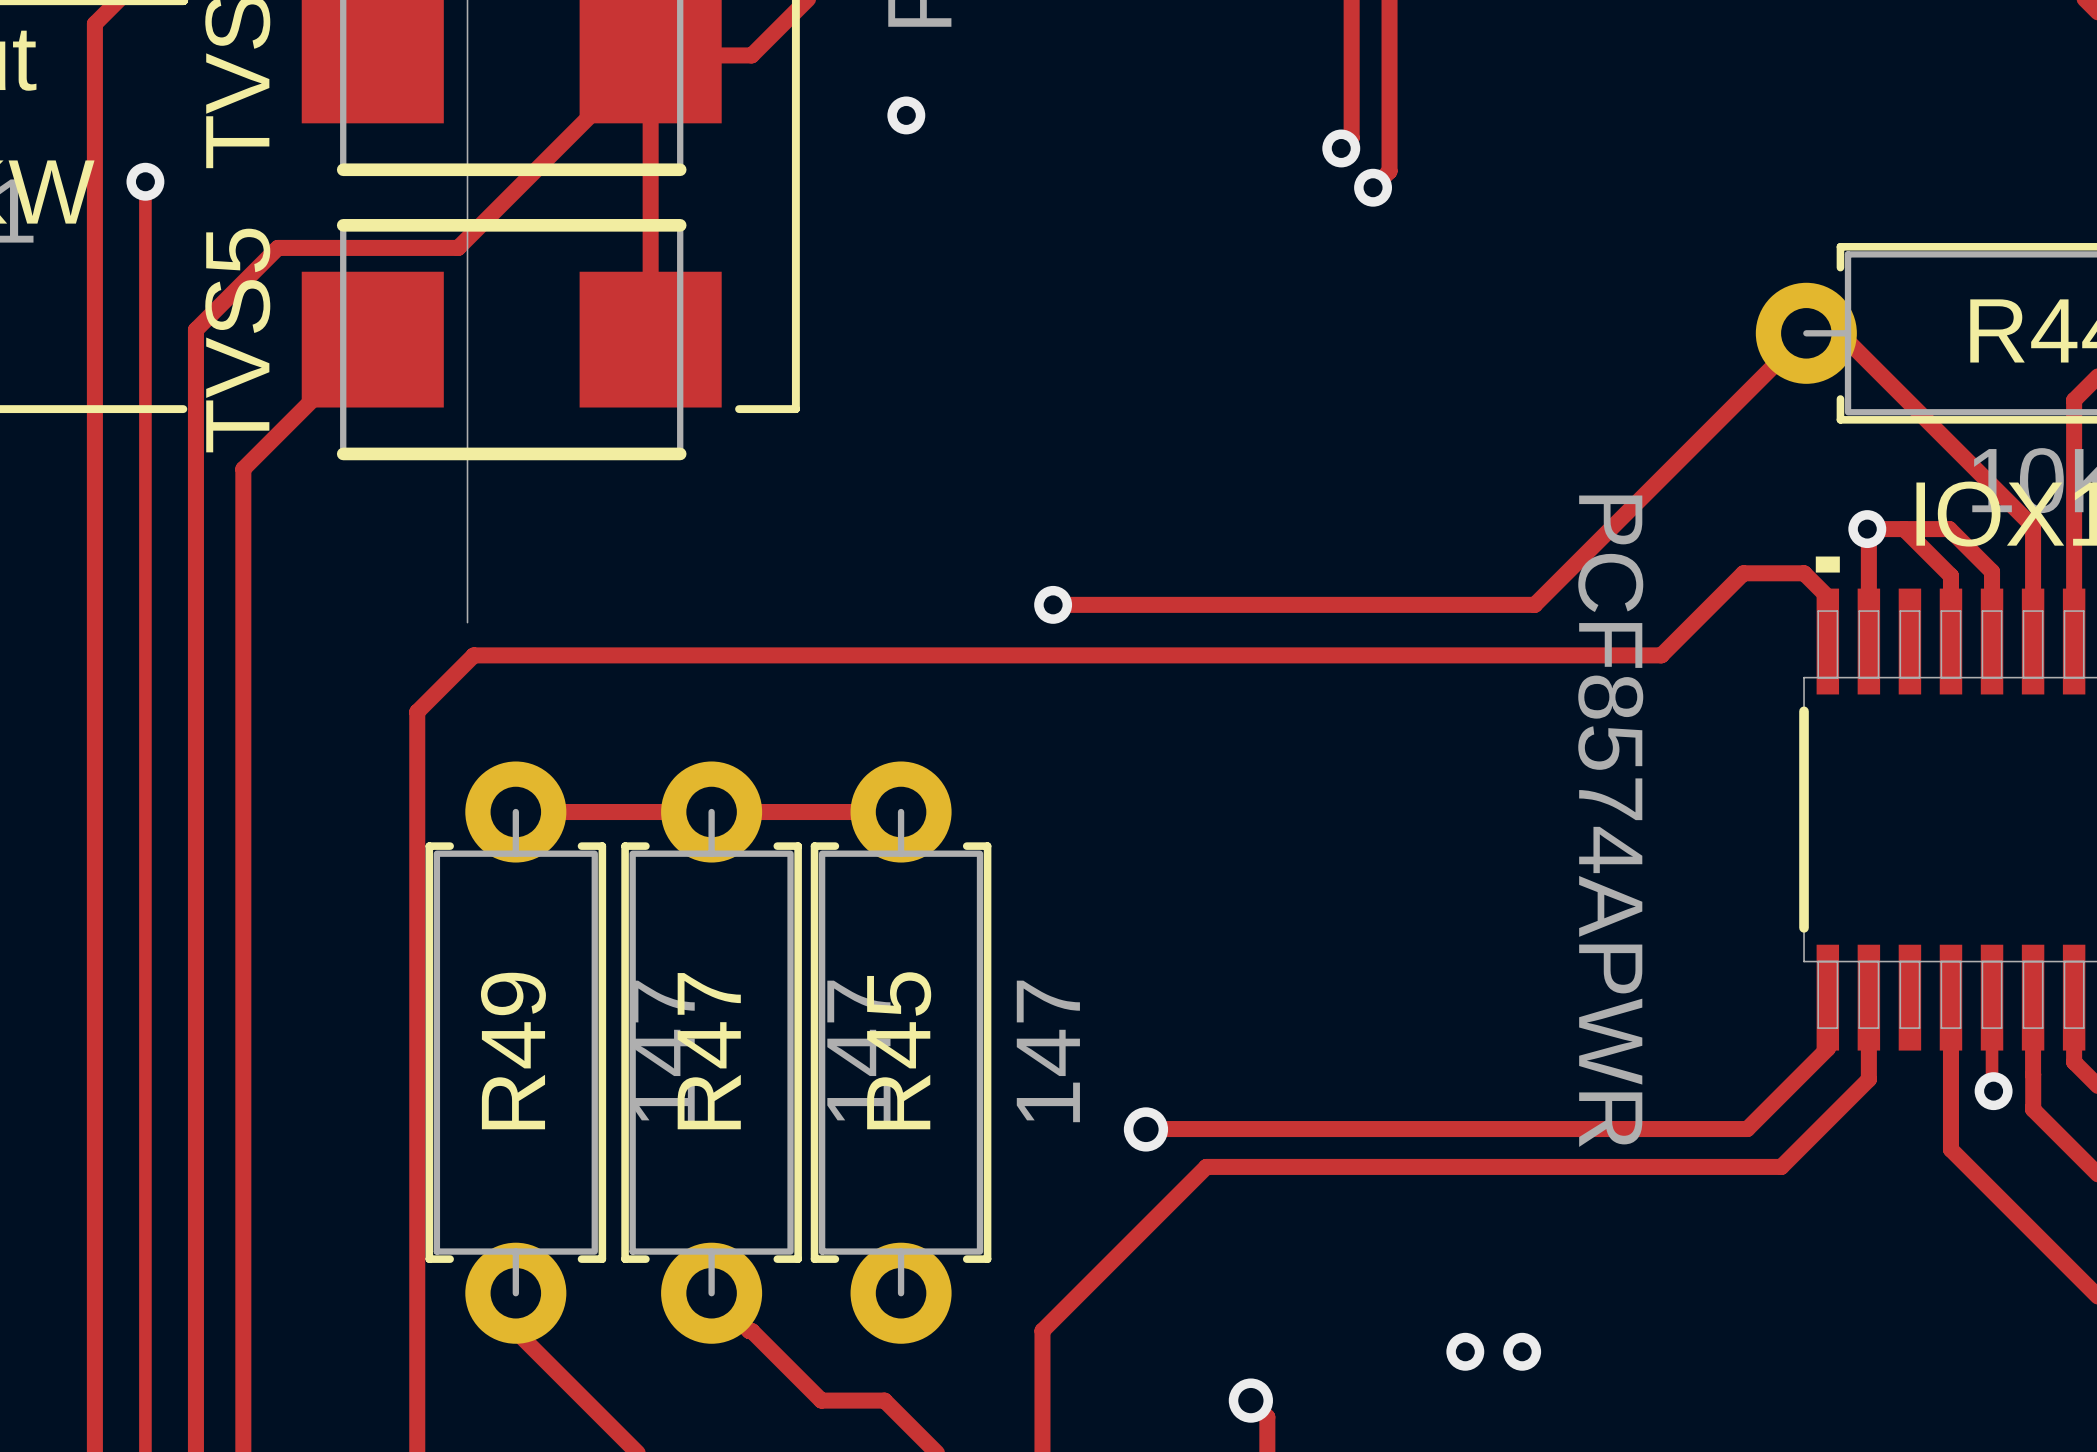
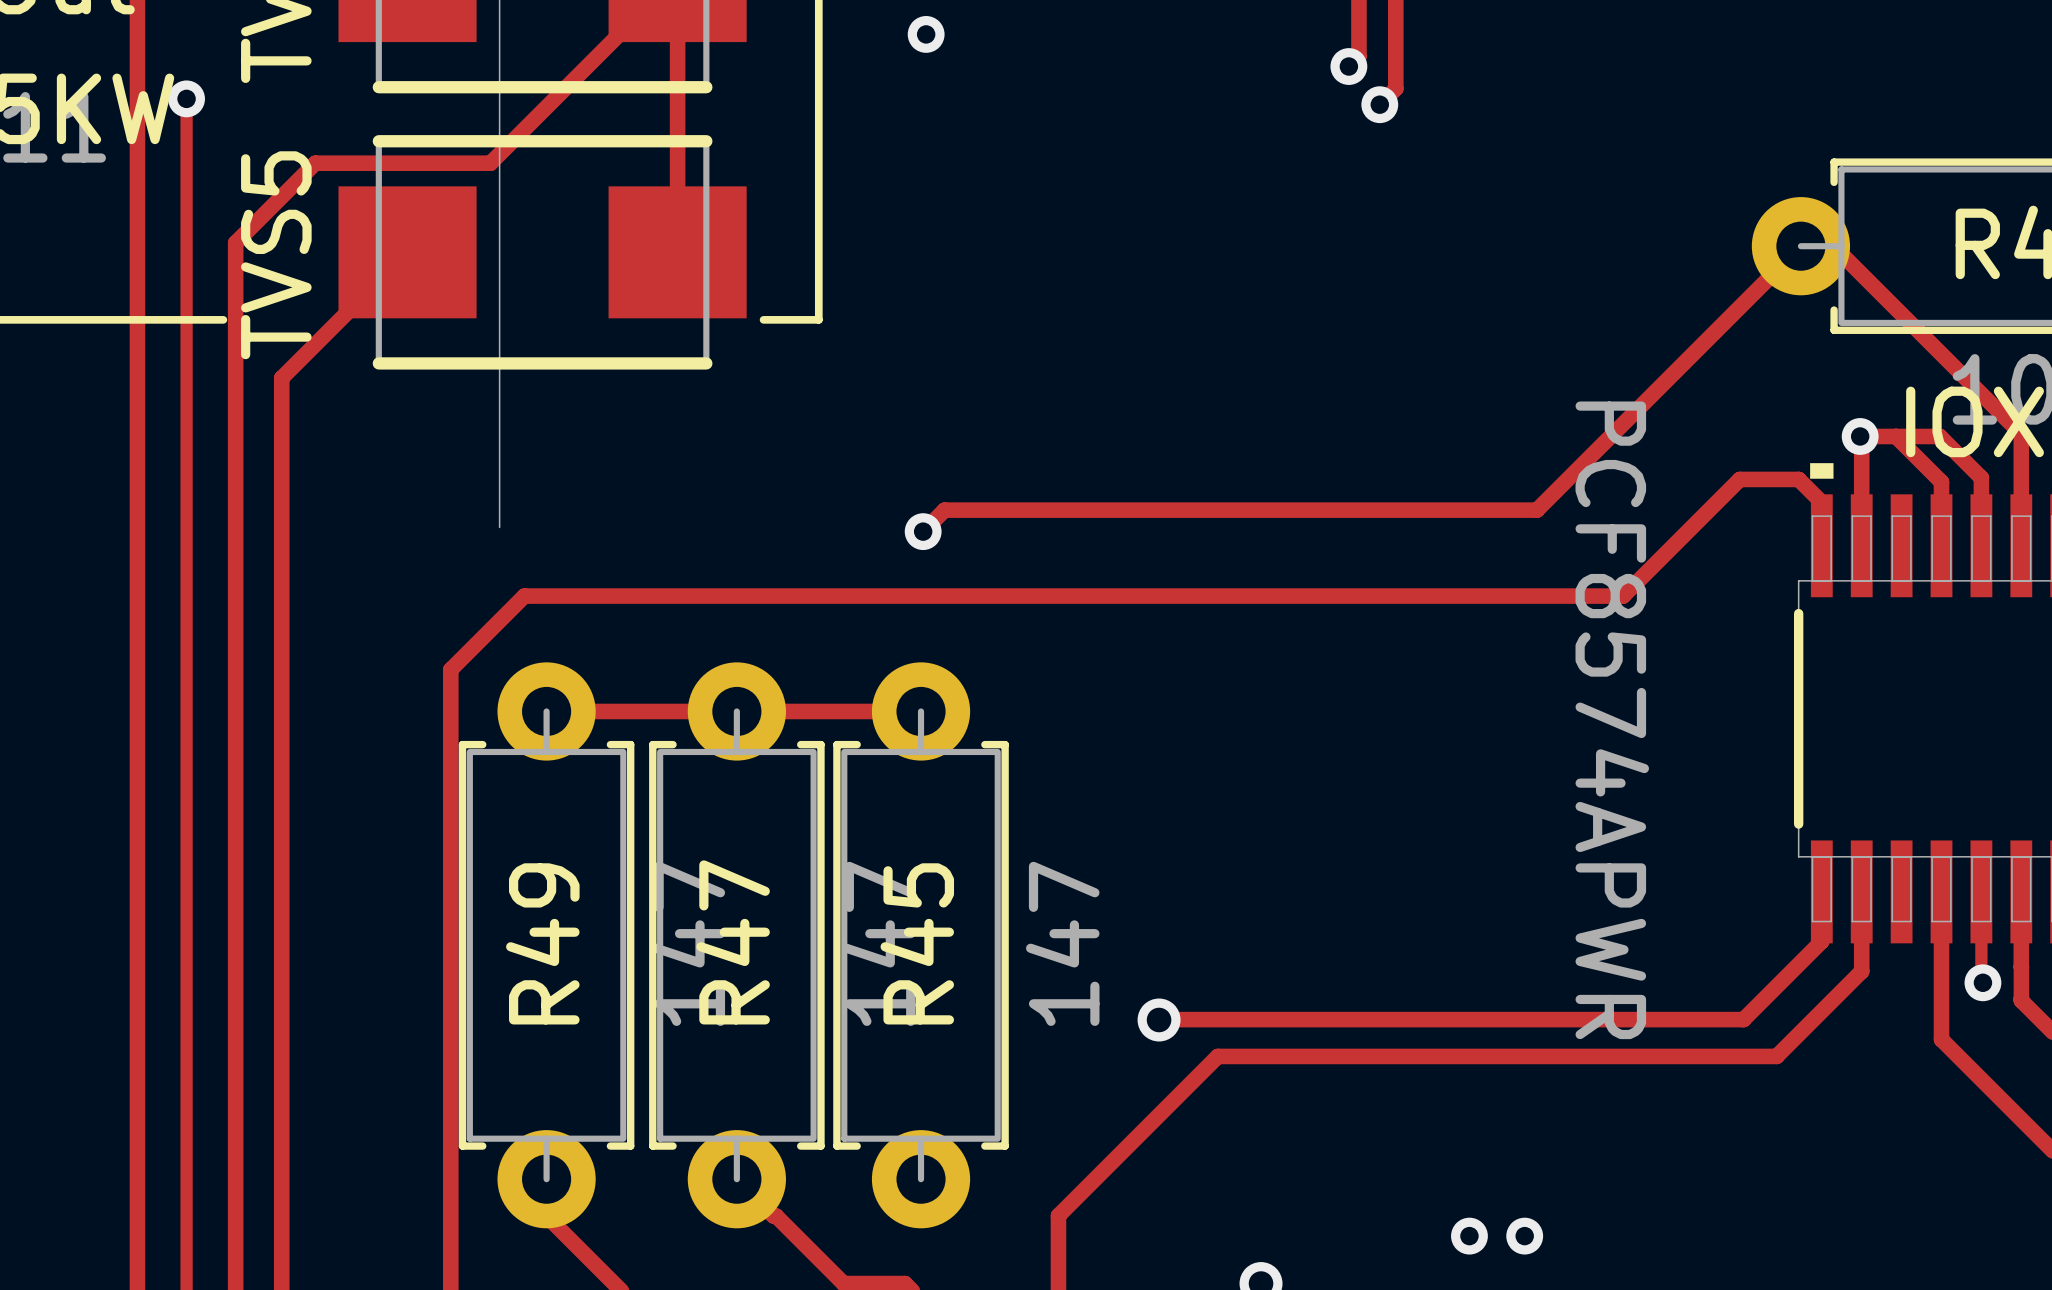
track: none -> (1068, 510) (944, 510) (923, 531)
via position: (1053, 604) -> (923, 531)
track: (1661, 655) (473, 655) (417, 711) (417, 769) -> (1660, 559) (1623, 596) (524, 596) (450, 669)

